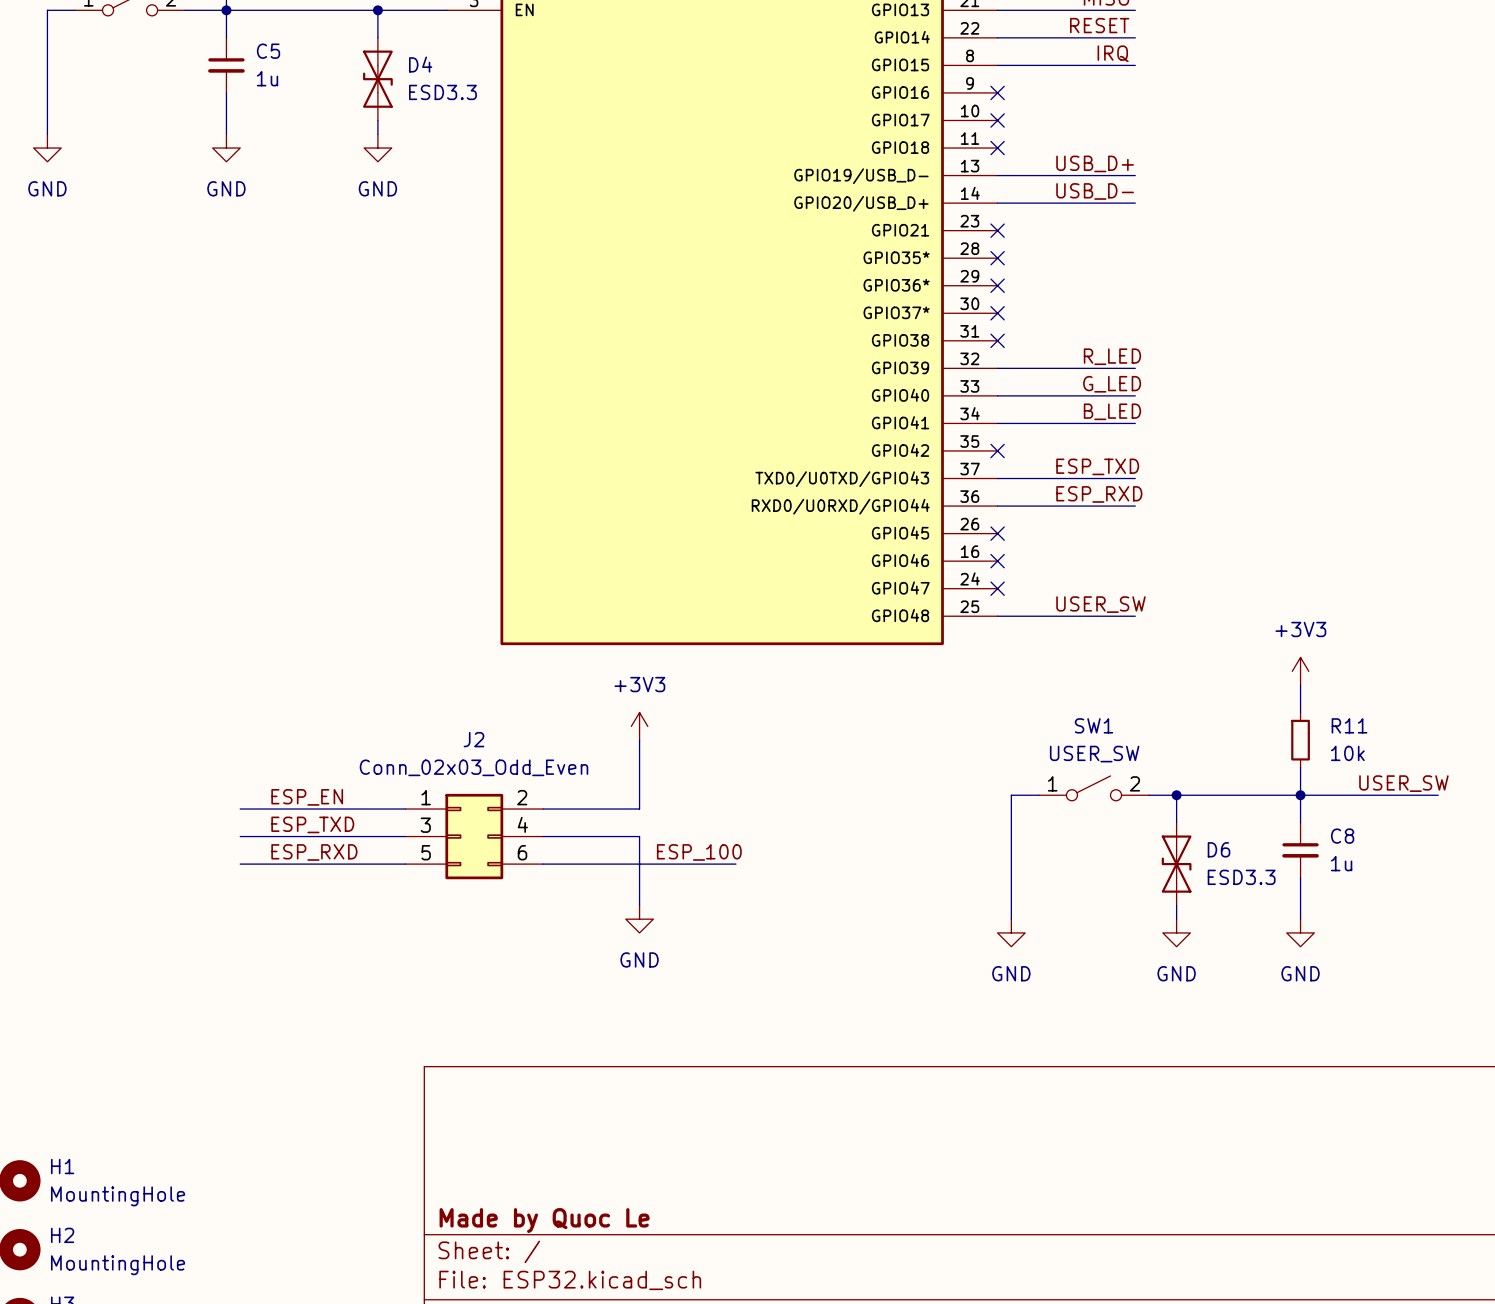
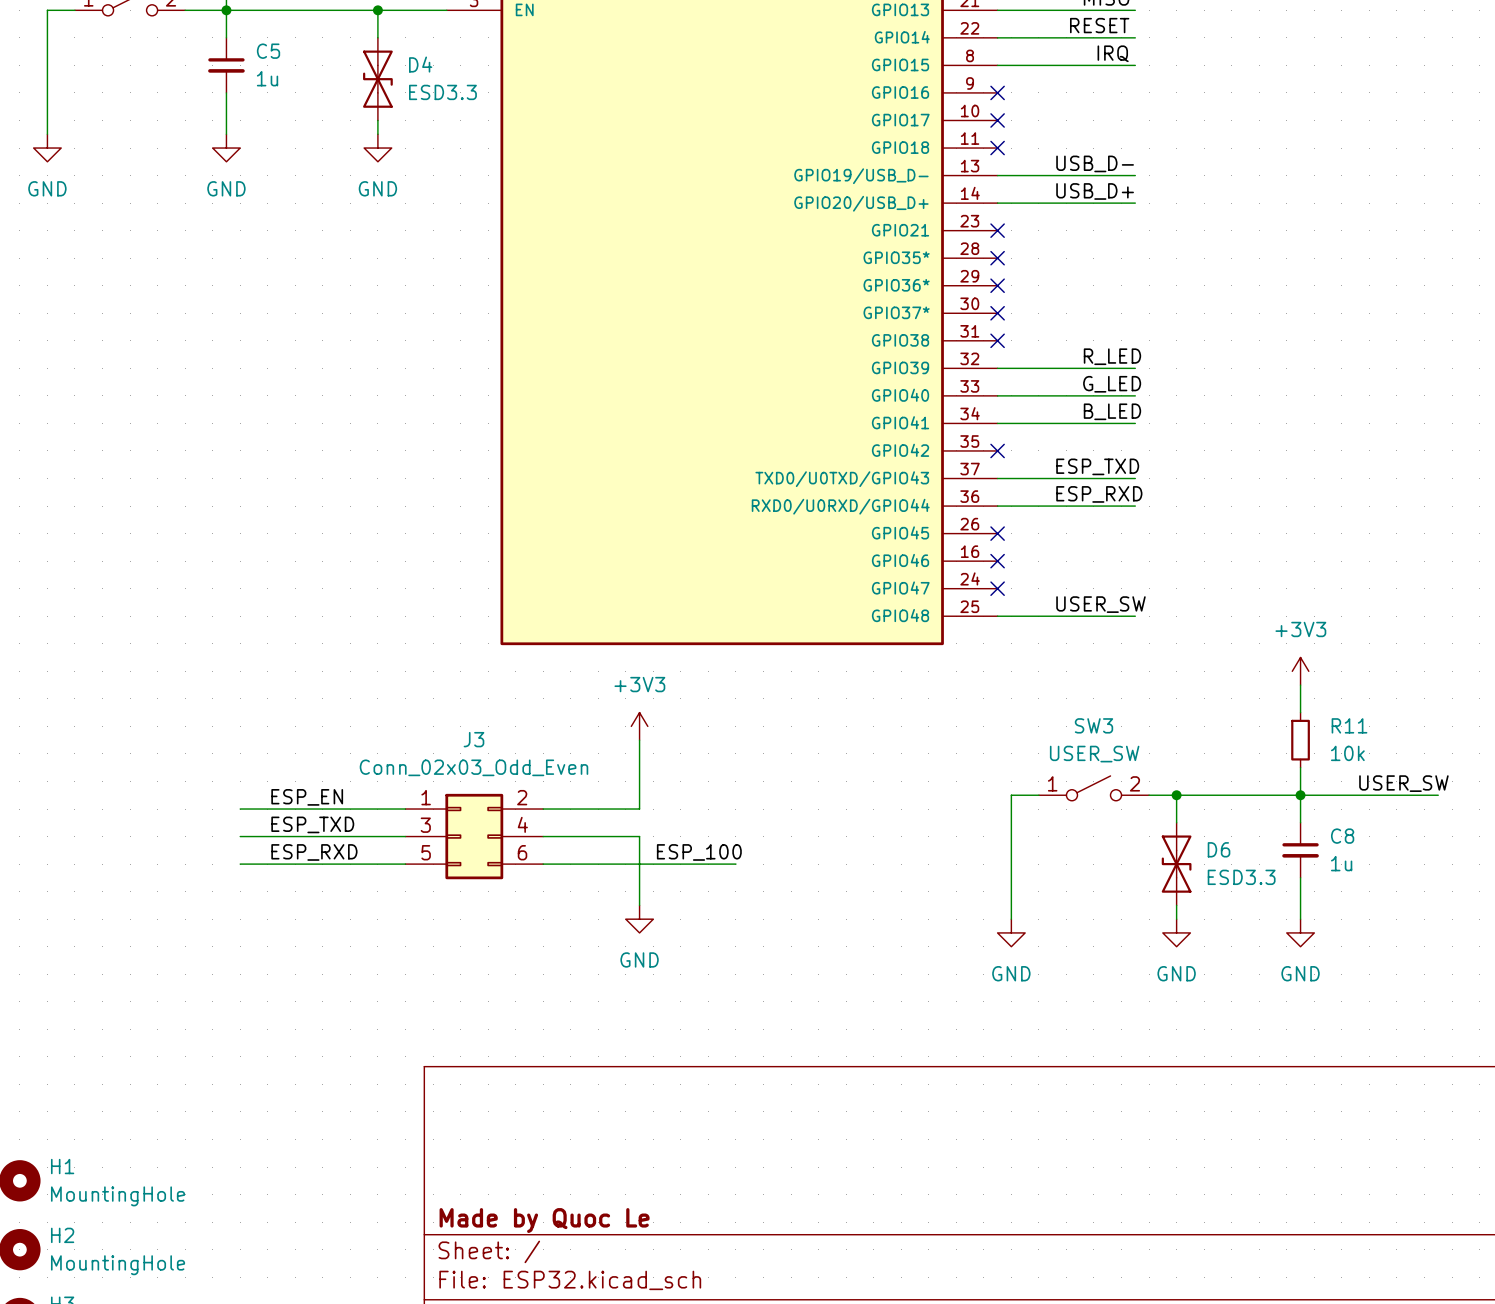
label: USB_D+ (1095, 163) -> USB_D- (1095, 163)
label: USB_D- (1095, 191) -> USB_D+ (1095, 191)
SW1 name: SW1 (1093, 725) -> SW3 (1093, 725)
J2 name: J2 (473, 739) -> J3 (473, 739)

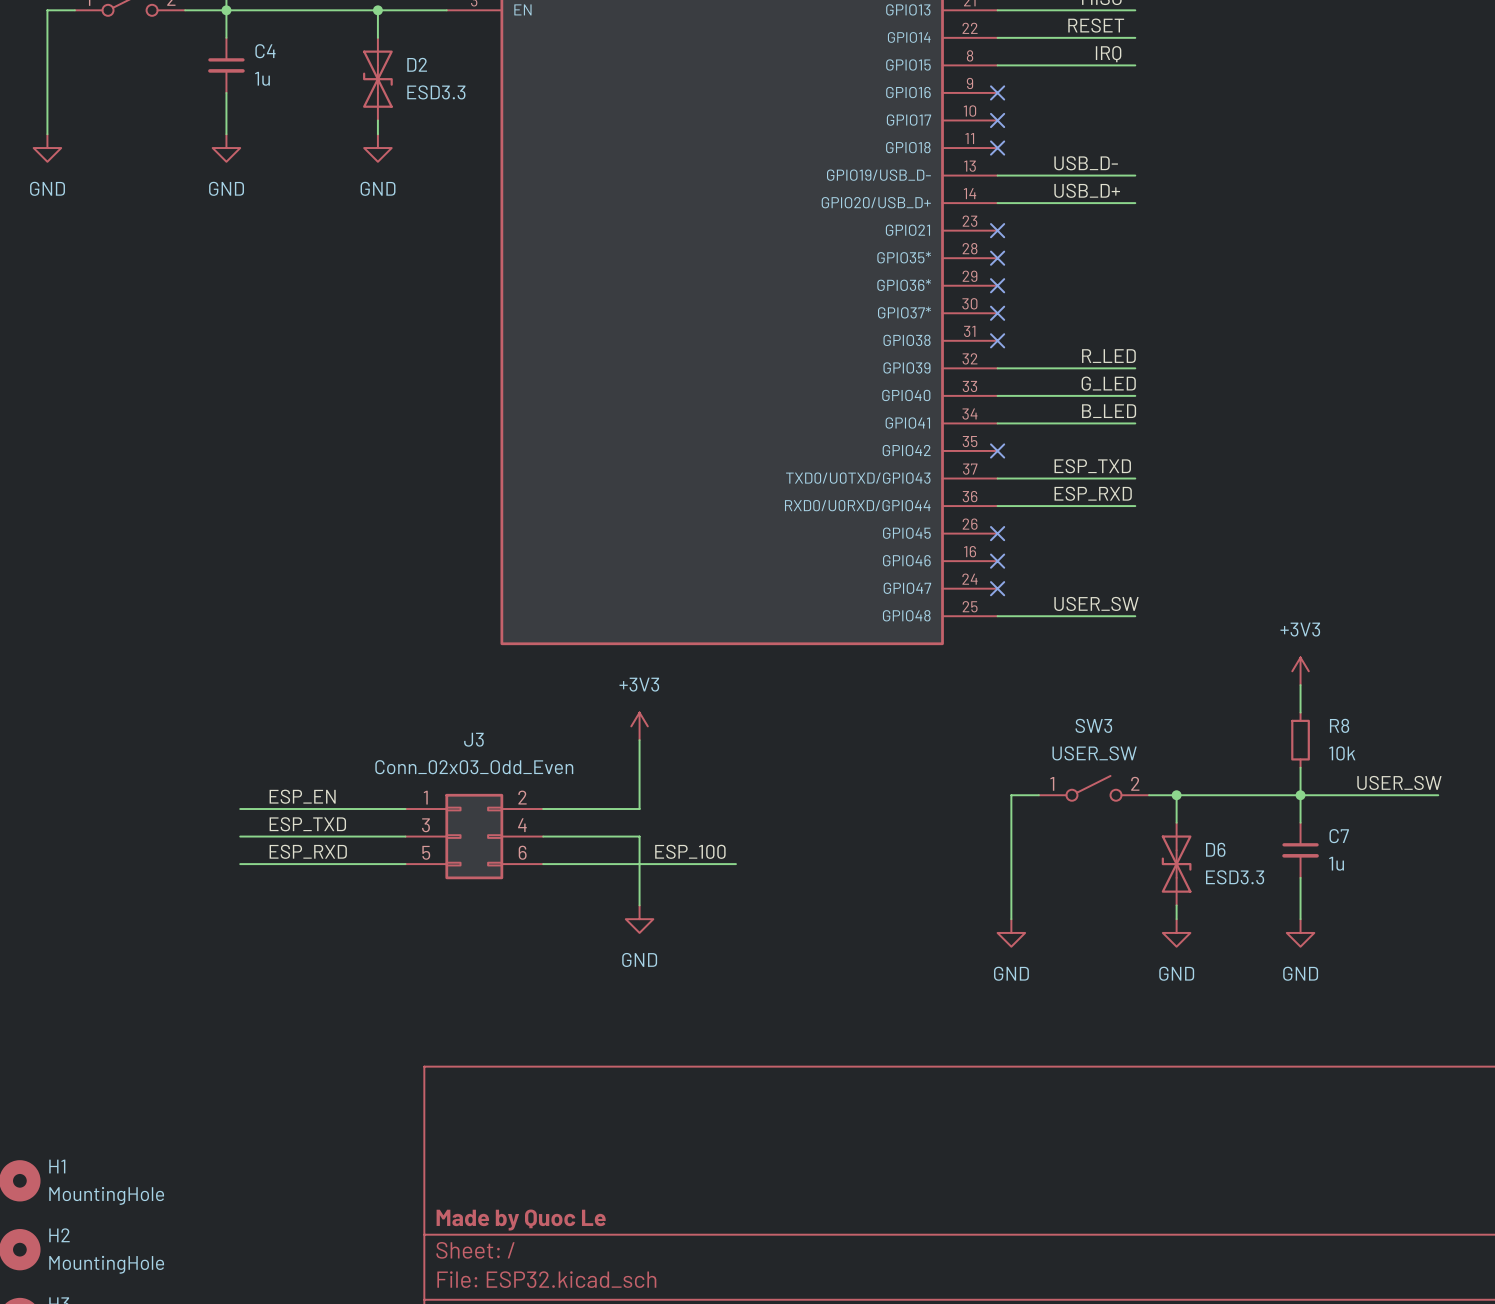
C5 name: C5 (268, 51) -> C4 (265, 51)
D4 name: D4 (420, 64) -> D2 (417, 64)
R11 name: R11 (1349, 725) -> R8 (1339, 725)
C8 name: C8 (1342, 836) -> C7 (1339, 836)

